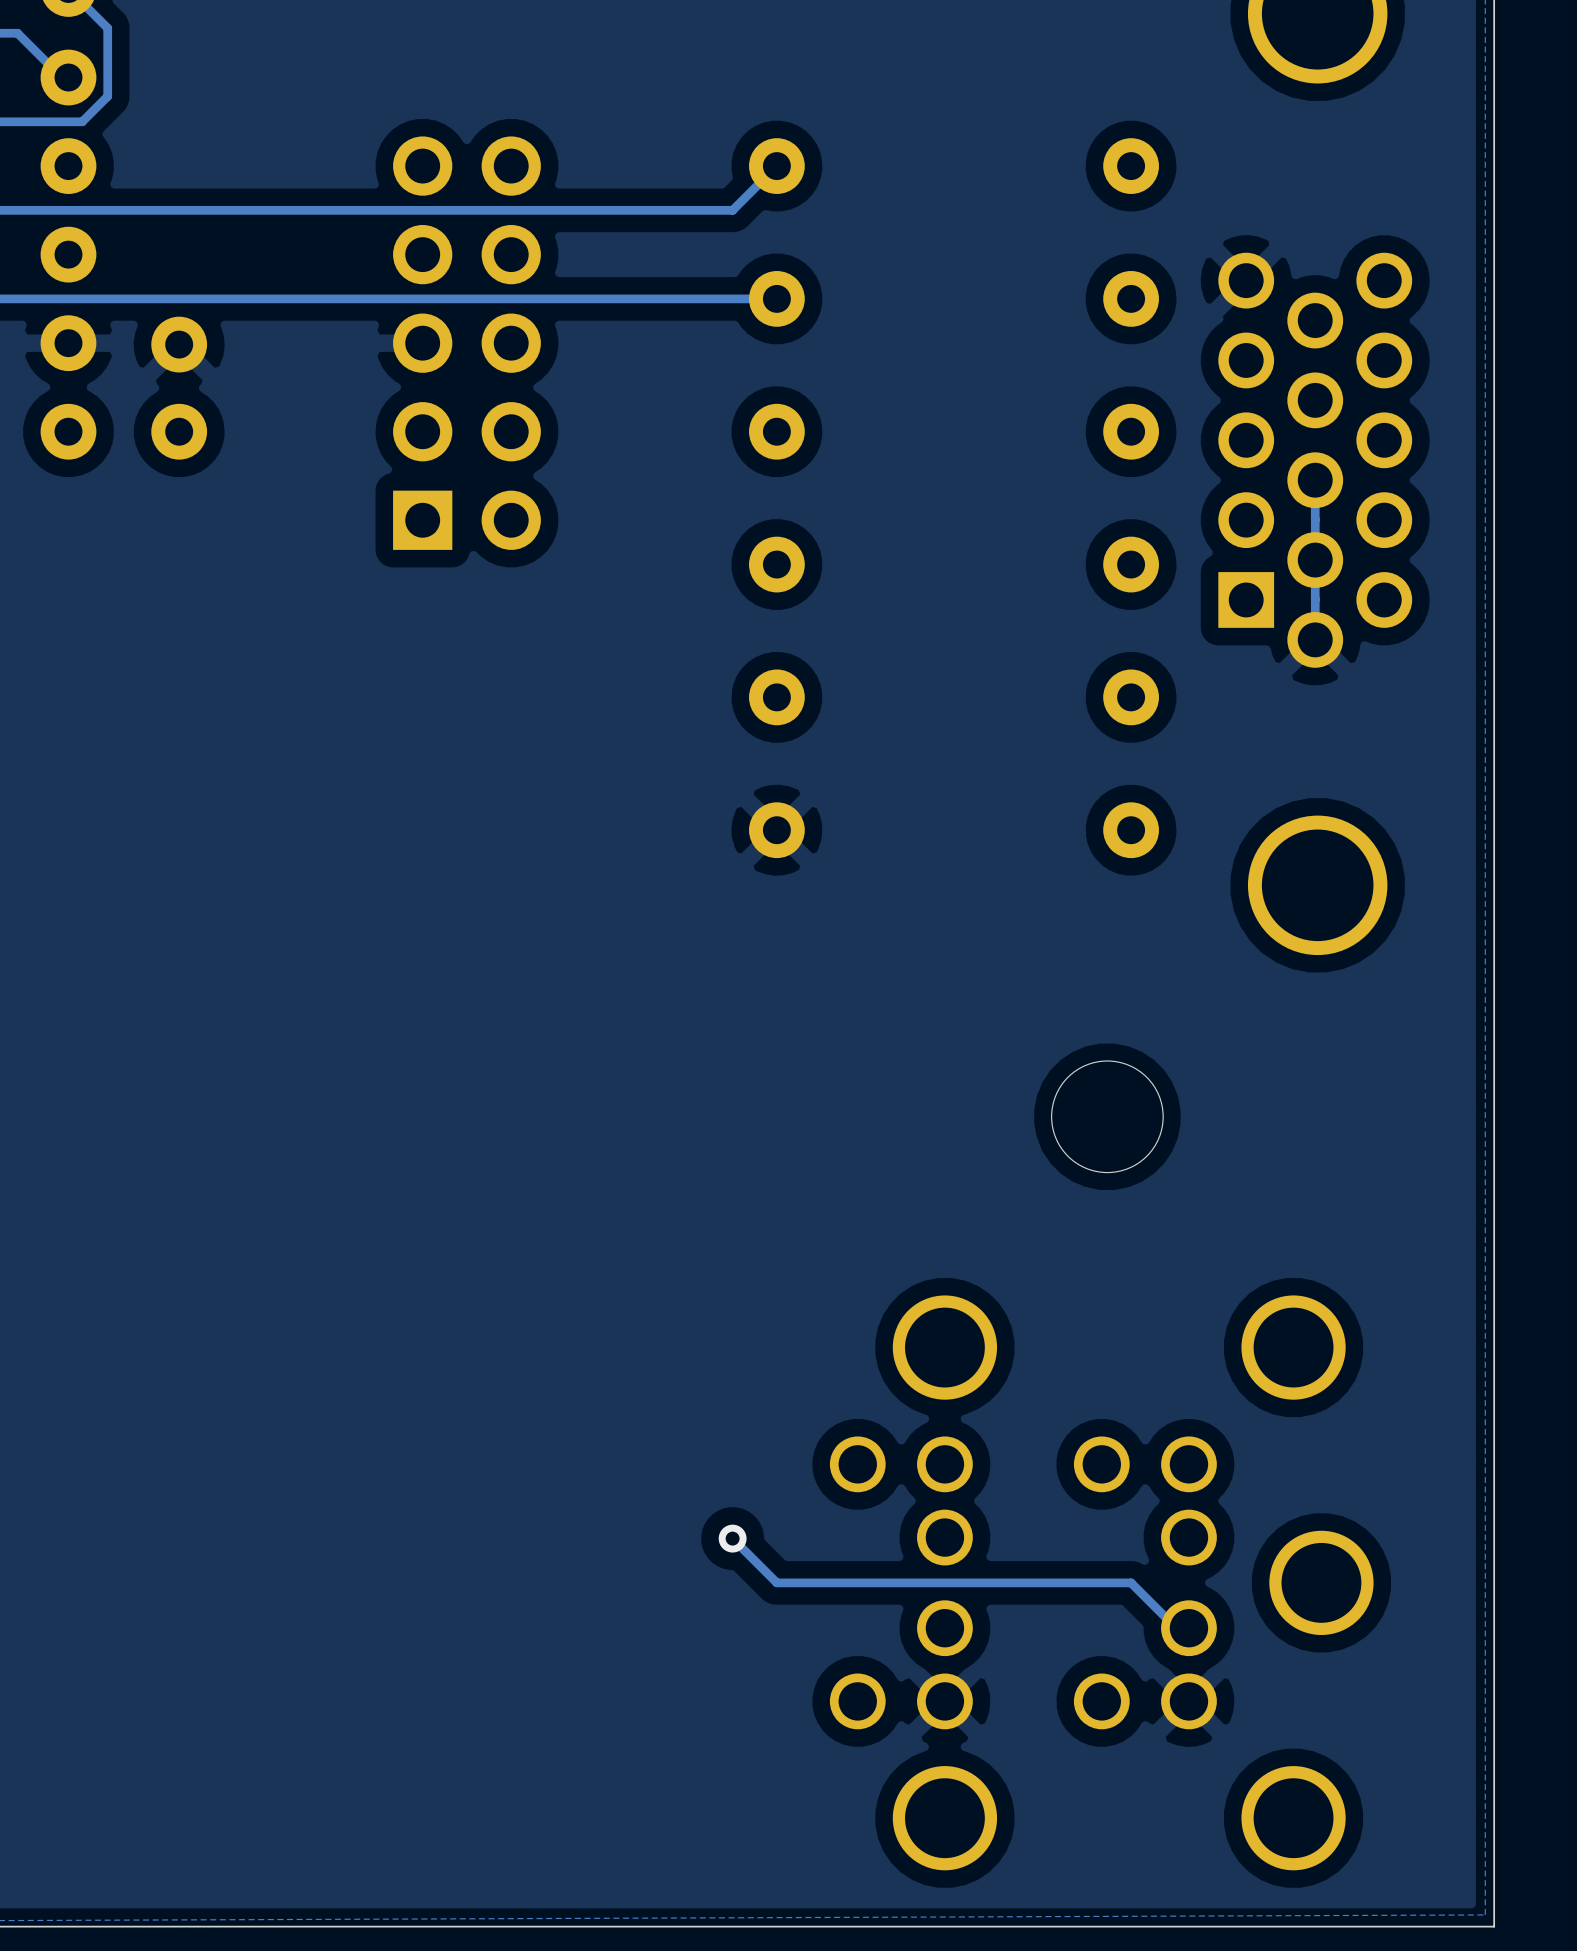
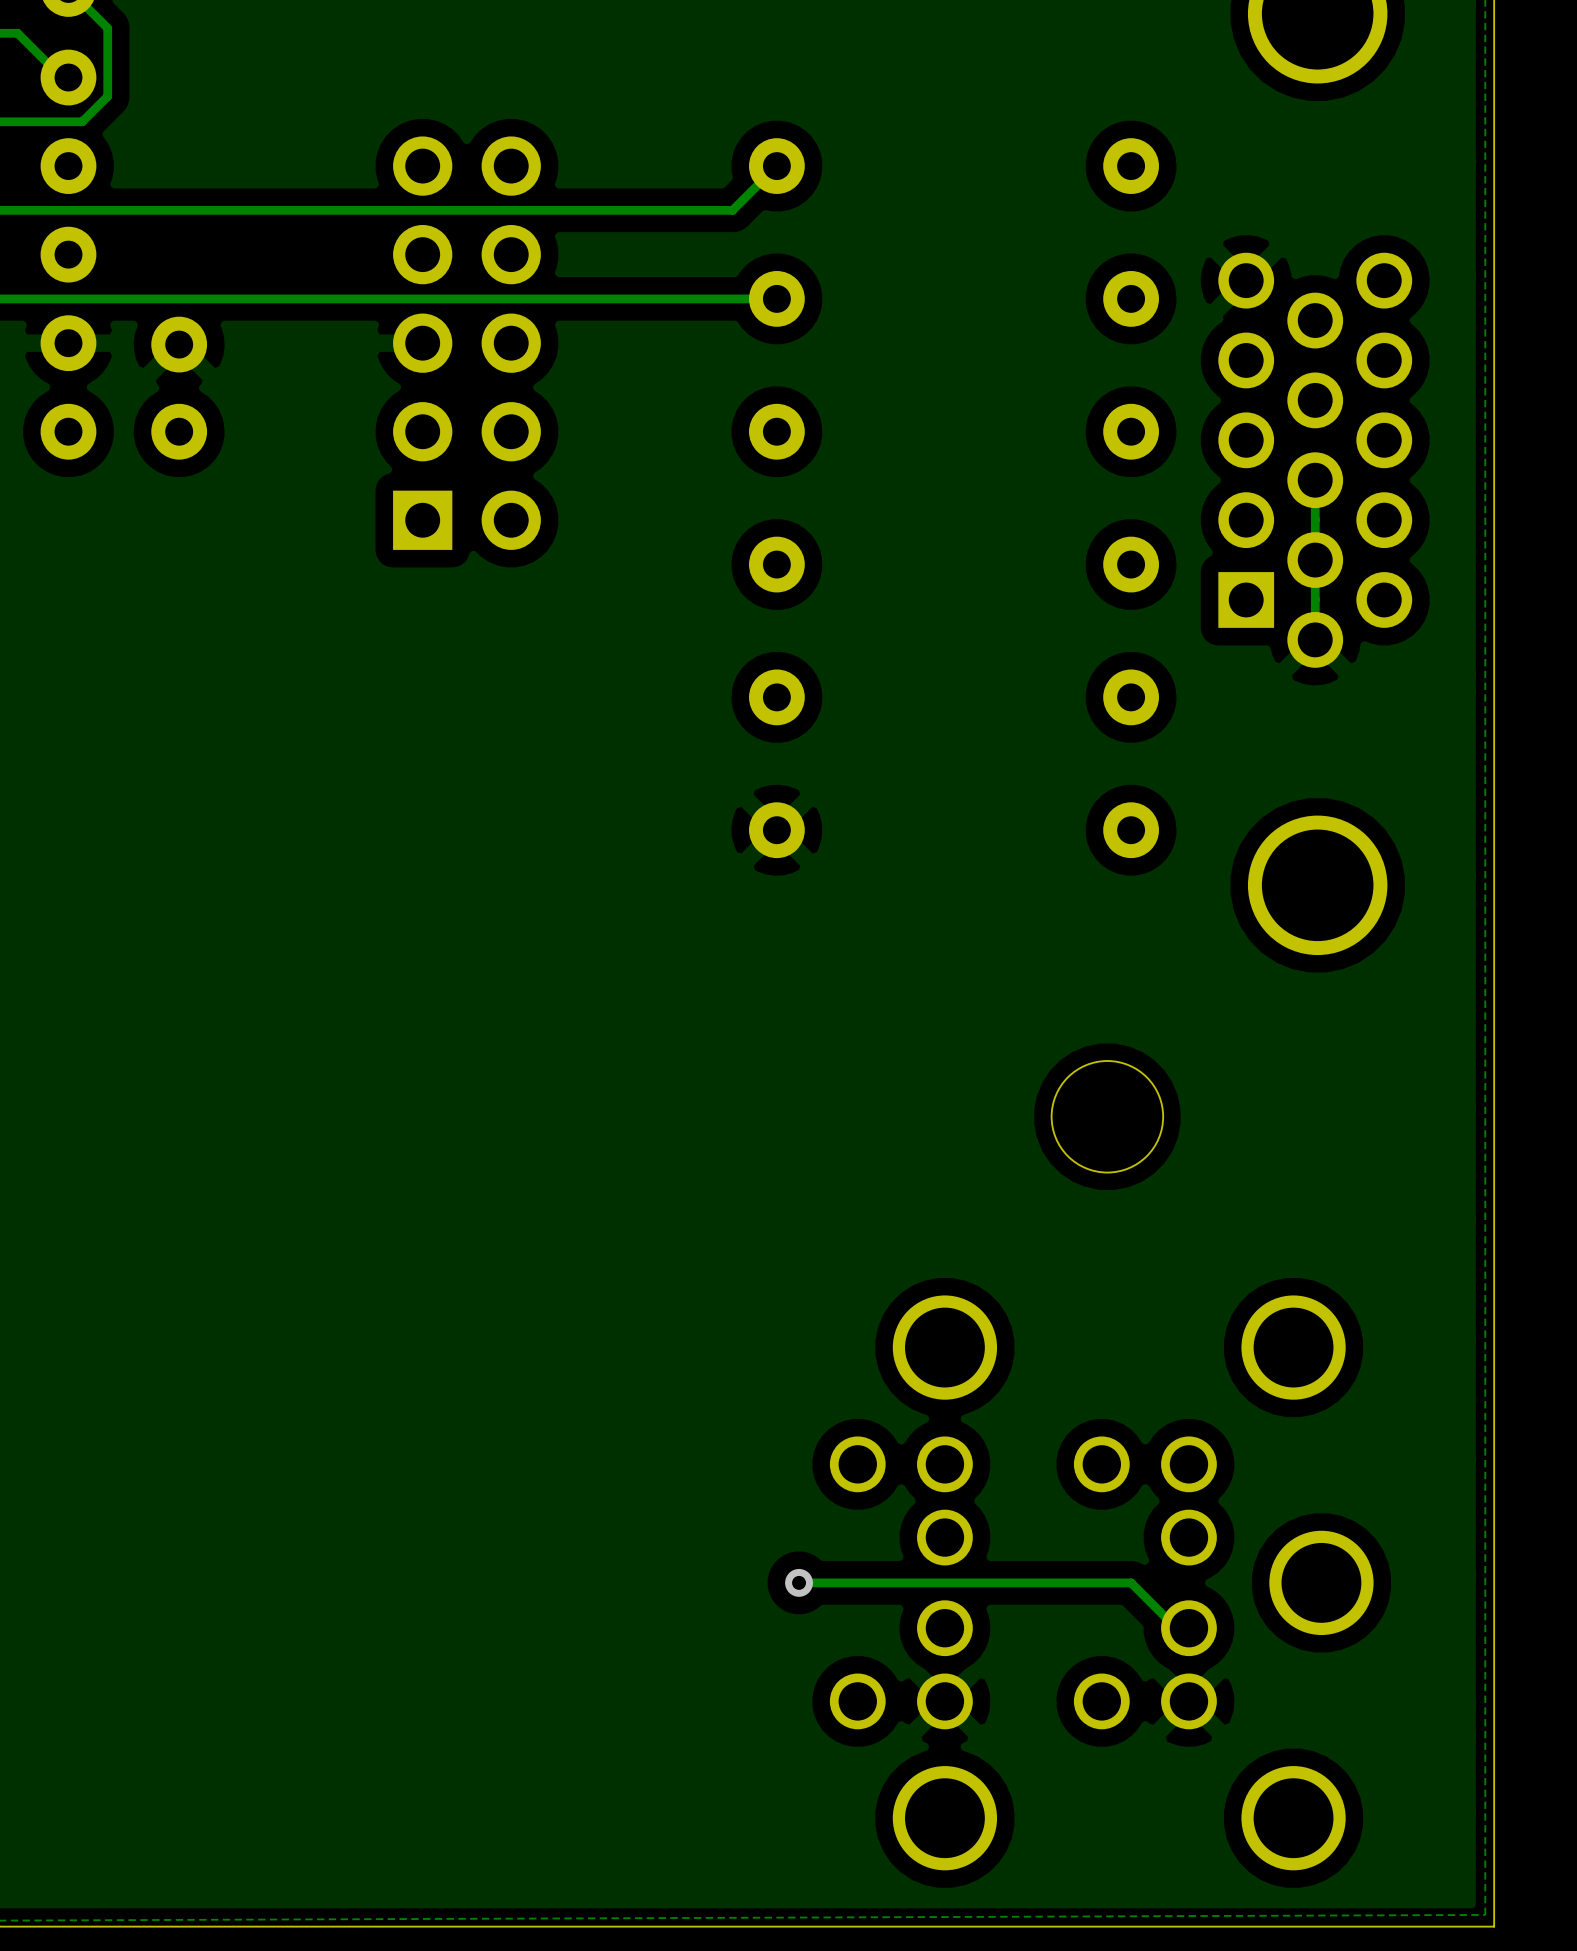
track: (732, 1538) (776, 1582) (799, 1582) -> none
via position: (732, 1538) -> (799, 1582)

